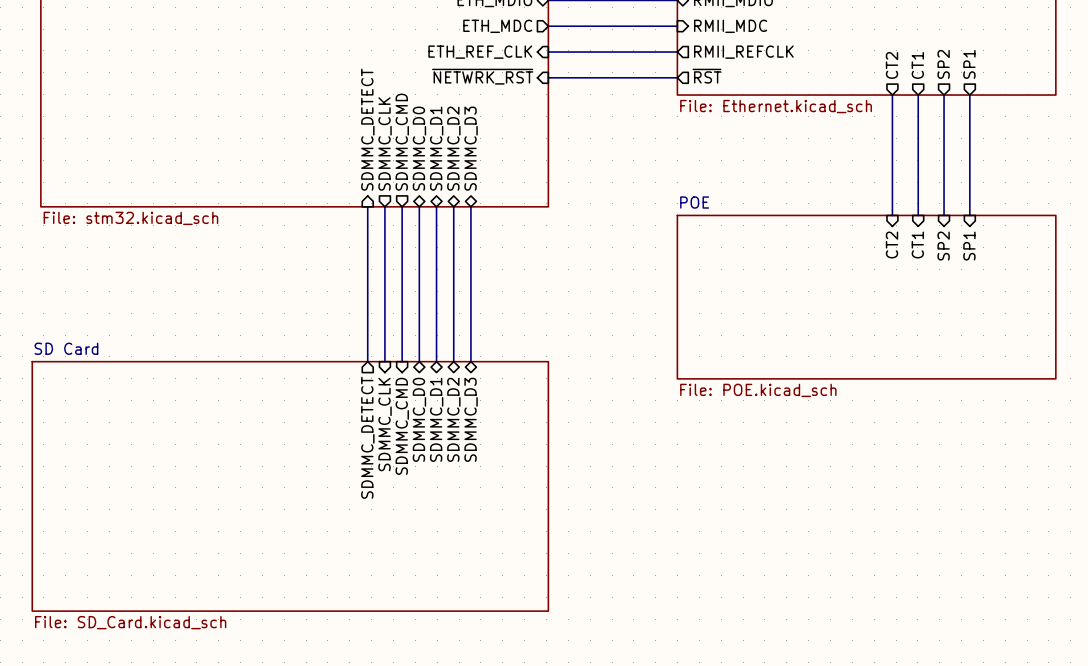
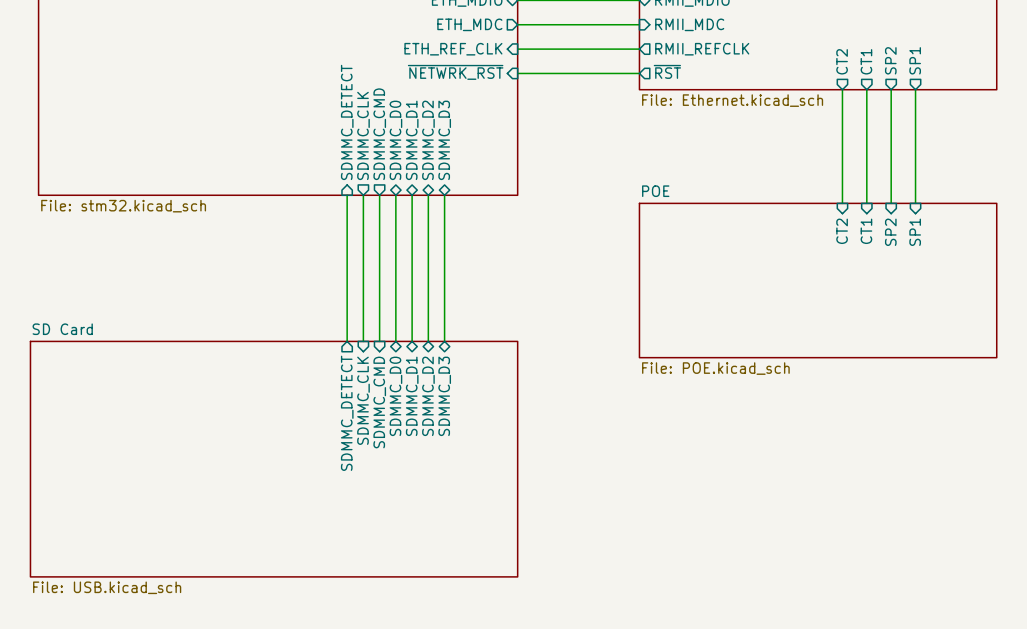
sheet SD Card value: File: SD_Card.kicad_sch (130, 622) -> File: USB.kicad_sch (107, 587)

